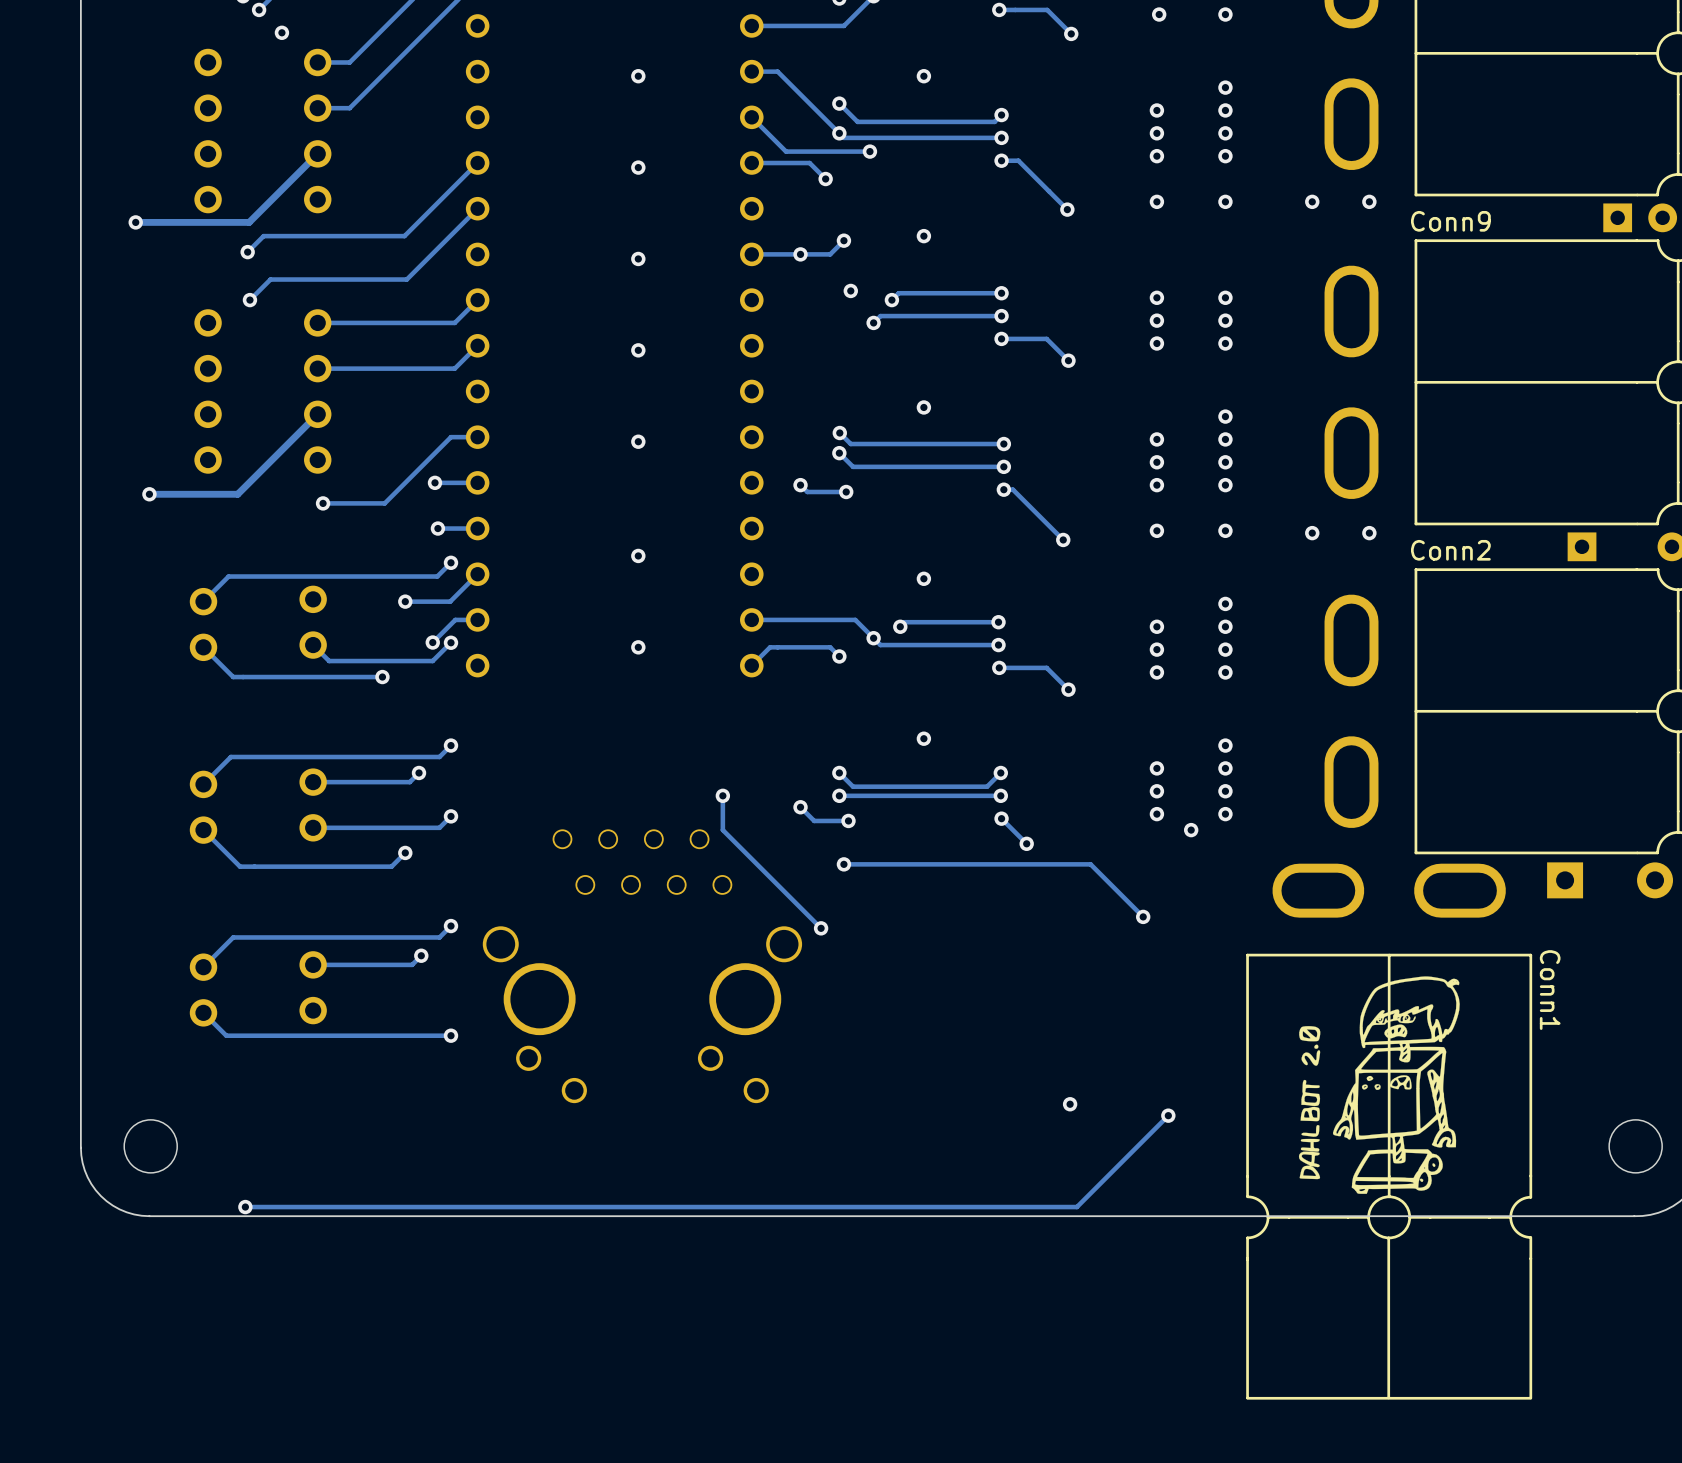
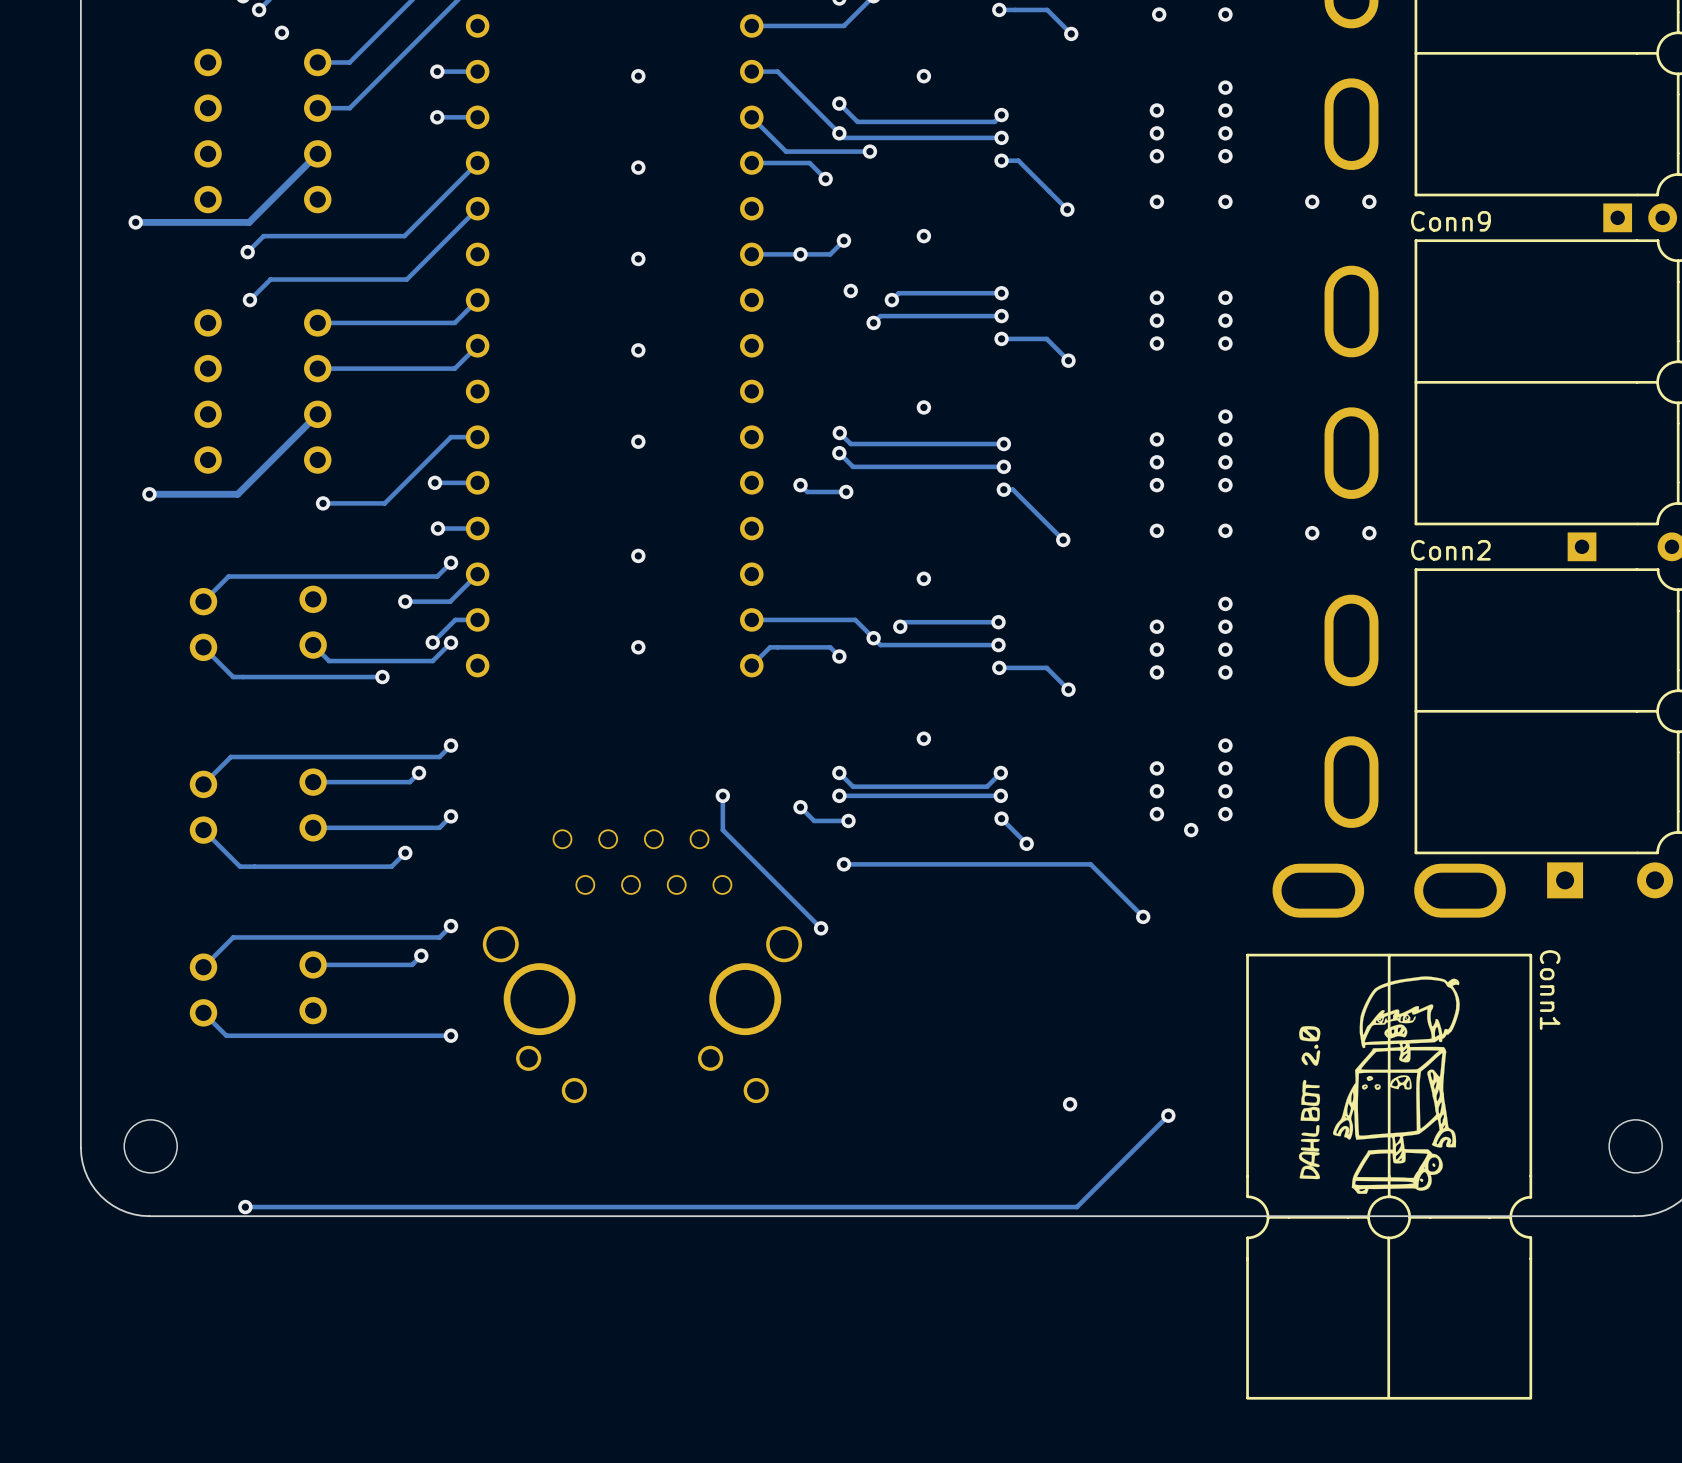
via: none -> (437, 71)
track: none -> (477, 71) (437, 71)
via: none -> (437, 117)
track: none -> (477, 117) (437, 117)

